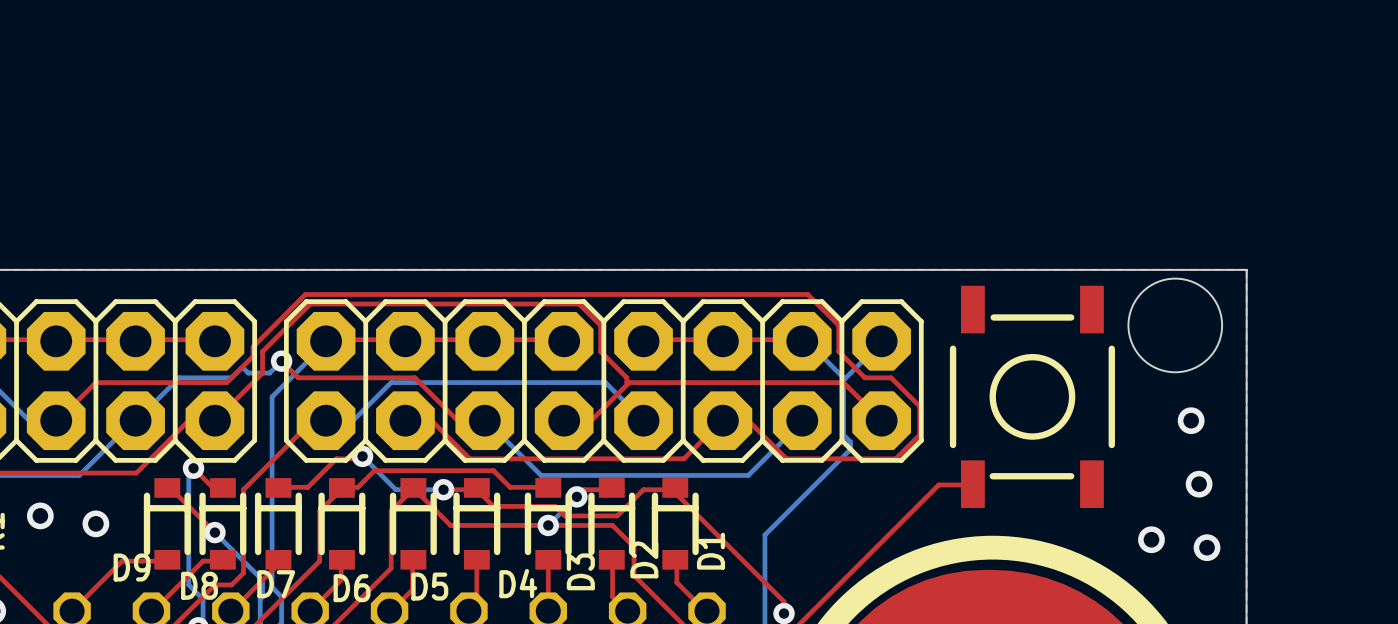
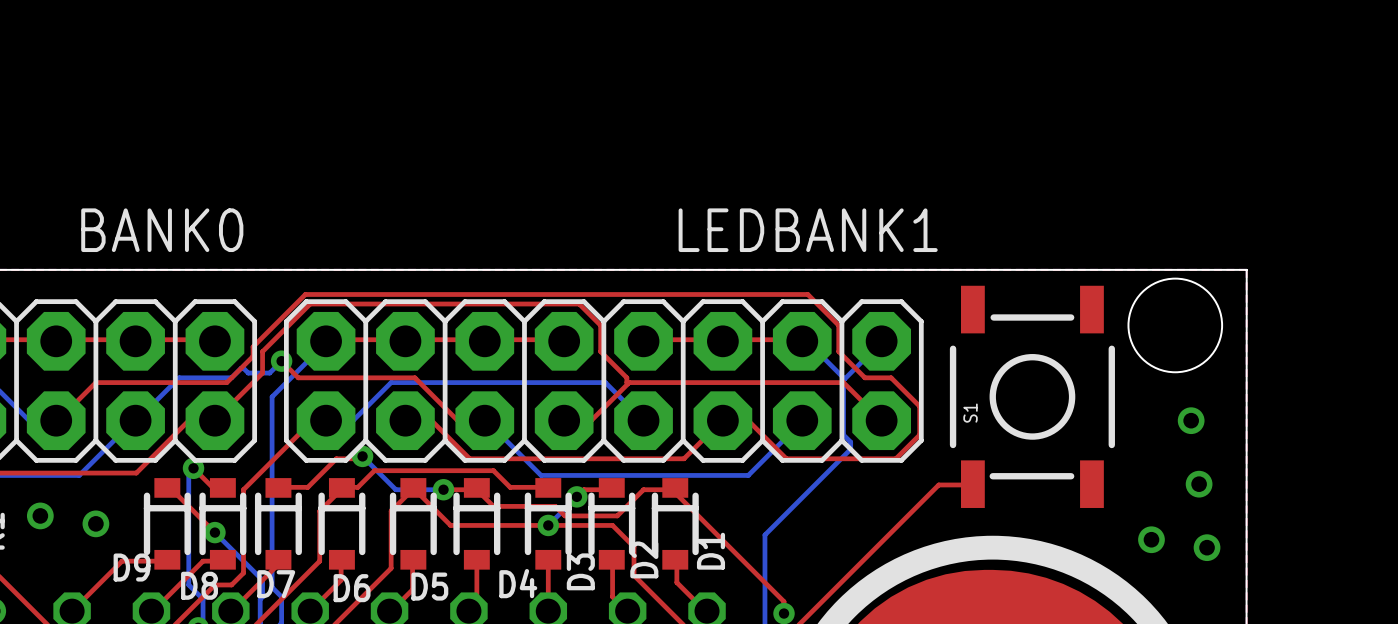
BANK0 name: none -> BANK0 (162, 230)
LEDBANK1 name: none -> LEDBANK1 (808, 230)
S1 name: none -> S1 (970, 413)

